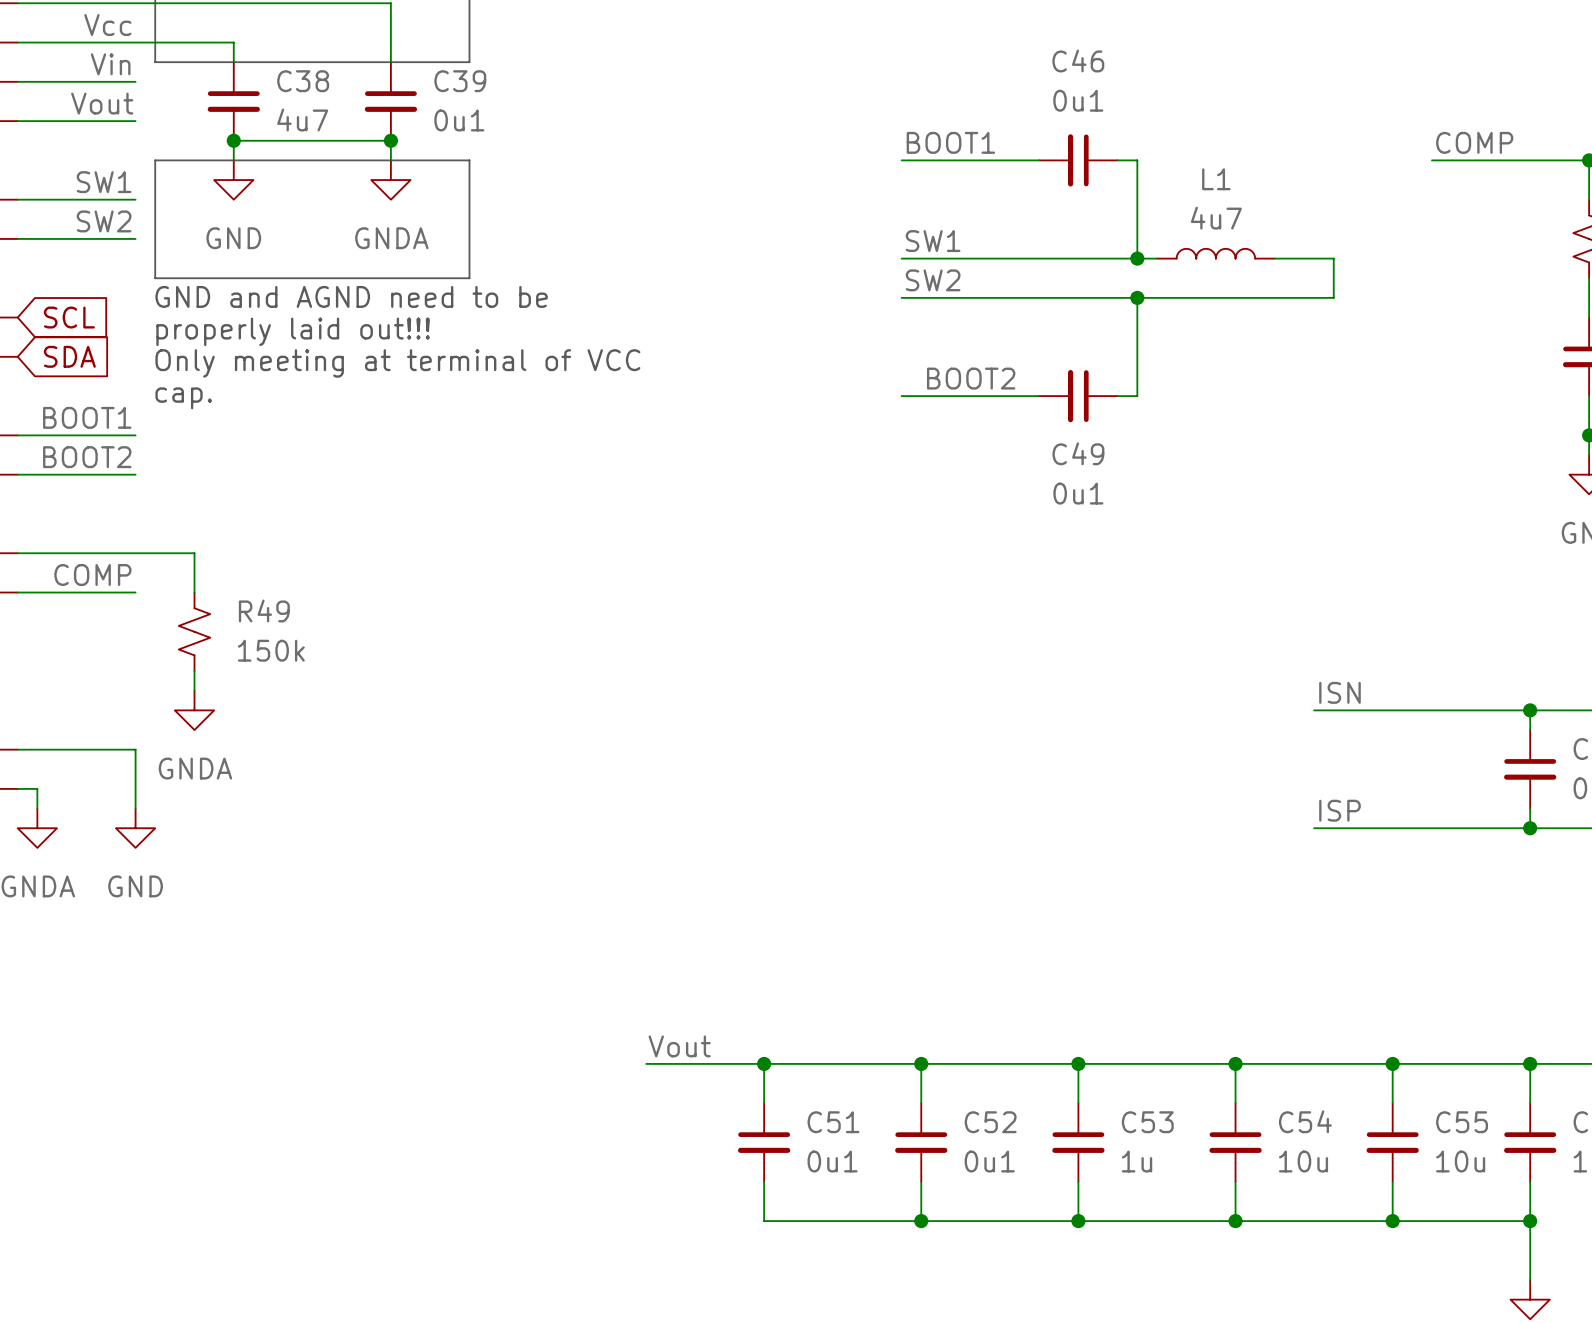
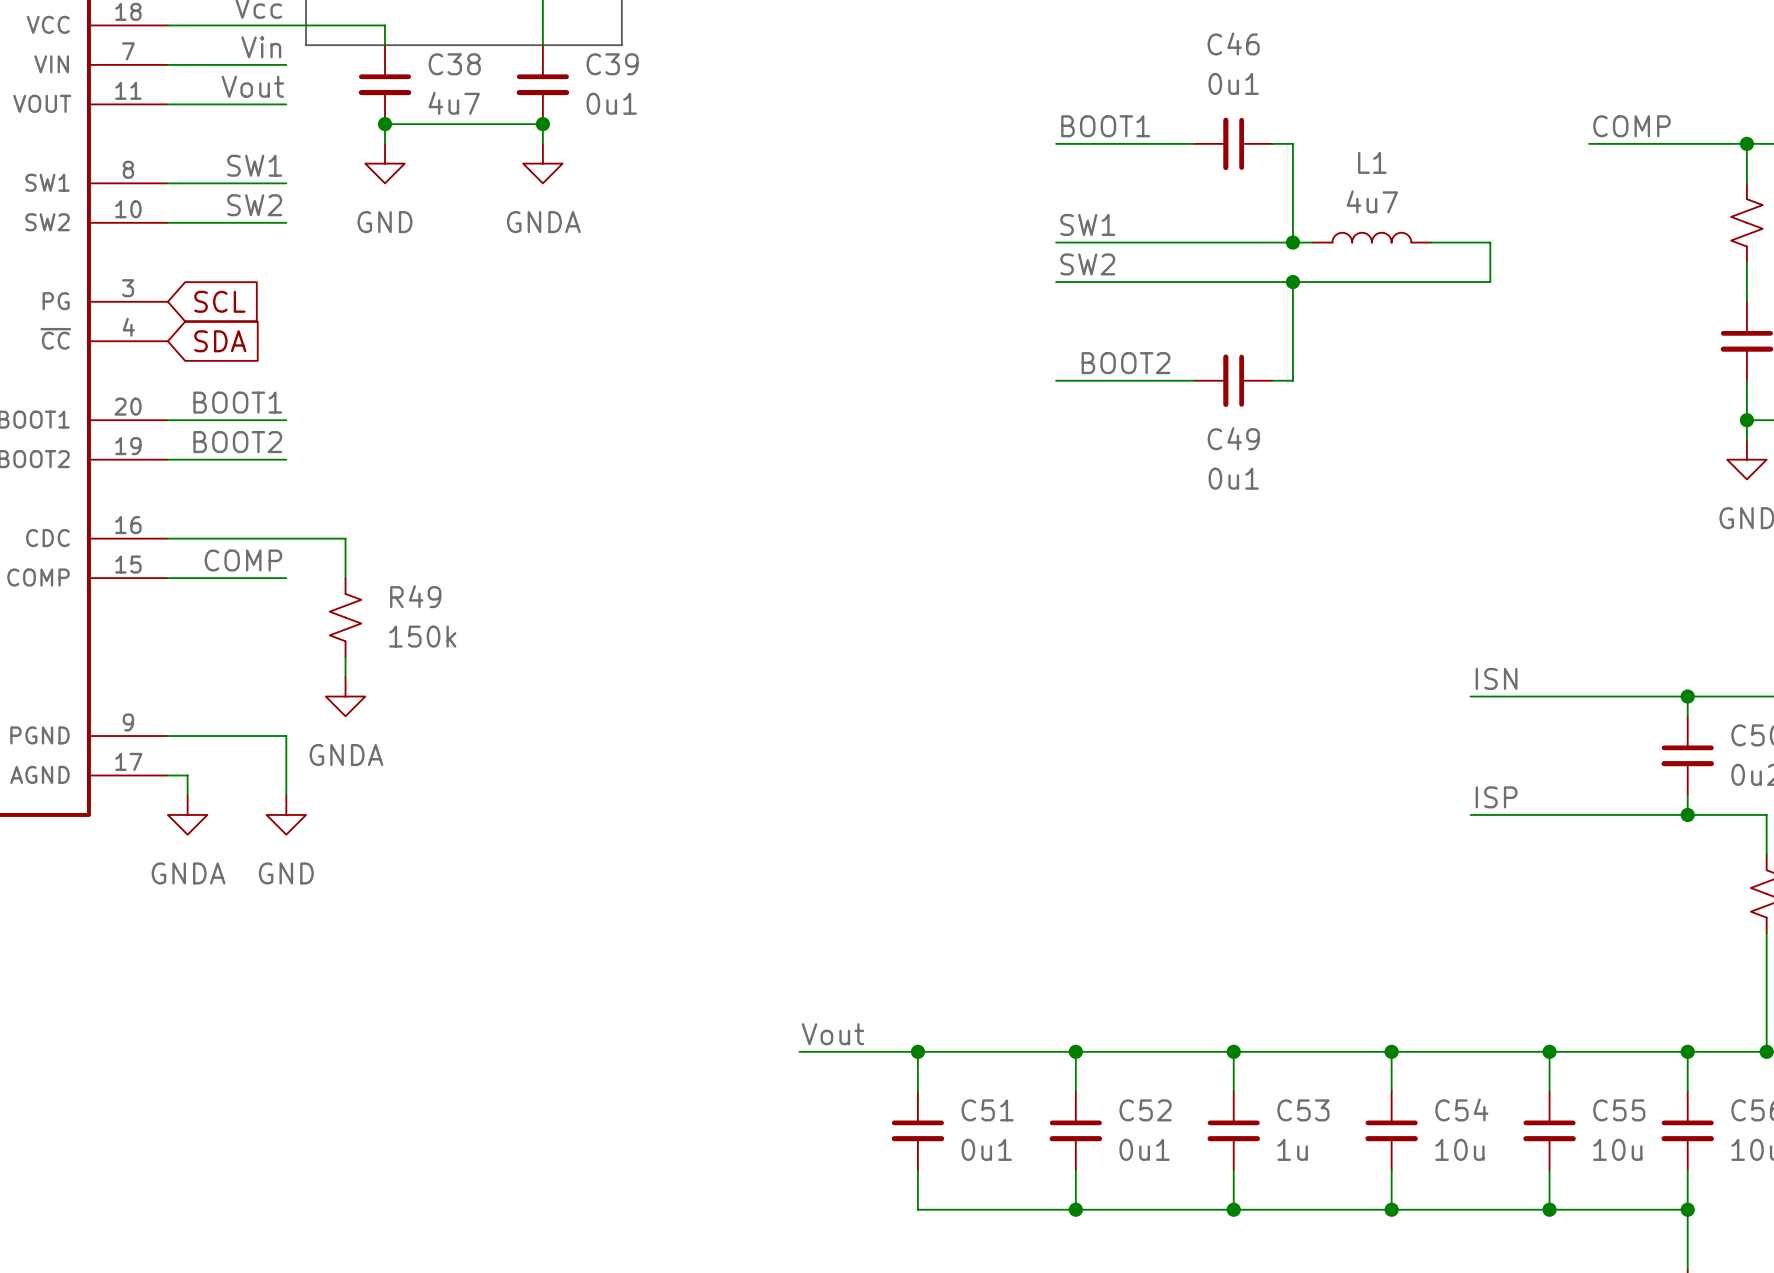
line: (155, 160) (469, 160) (469, 278) (155, 278) (155, 160) -> none
text: GND and AGND need to be (351, 296) -> none
text: properly laid out!!! (293, 331) -> none
text: Only meeting at terminal of VCC (397, 363) -> none
text: cap. (183, 398) -> none

